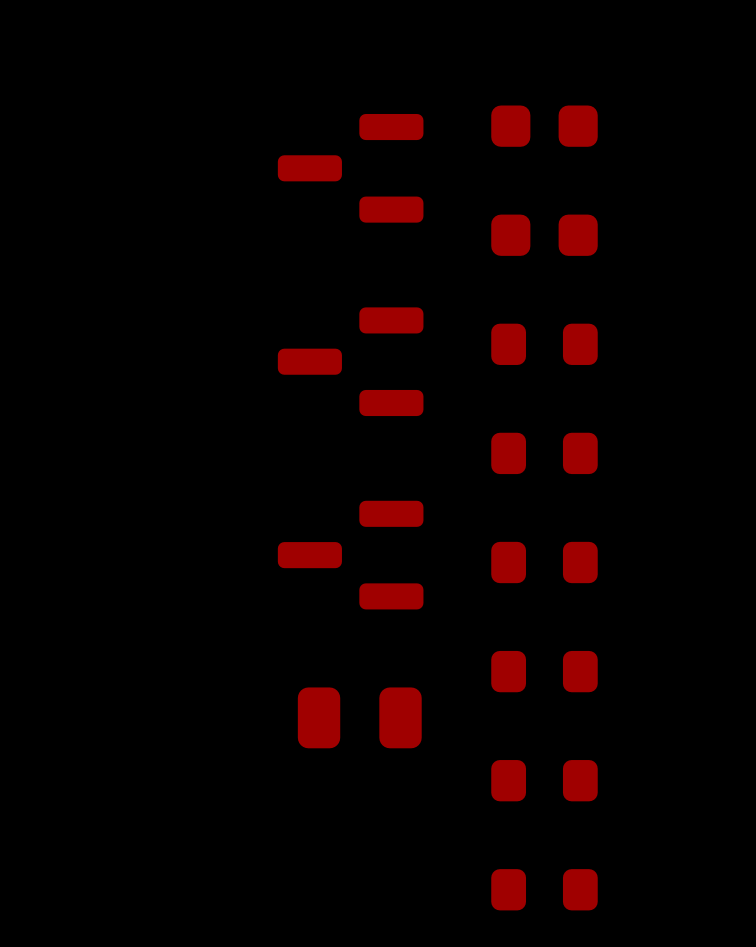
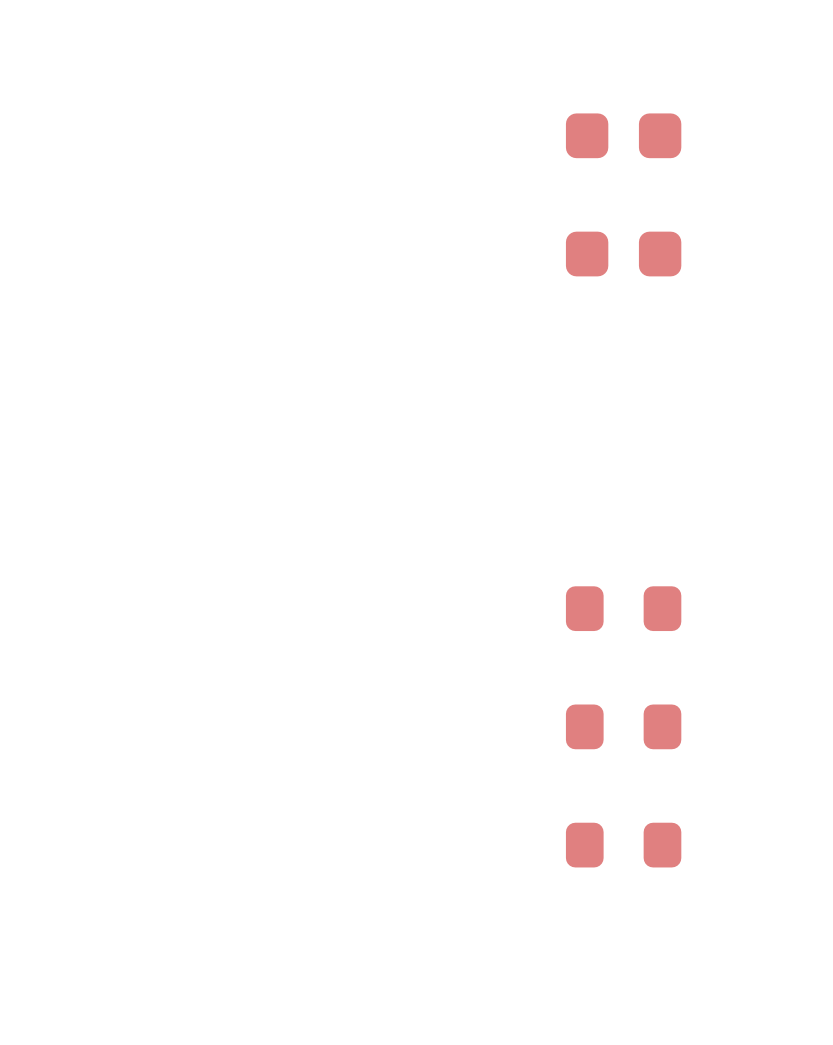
part: (350, 168) -> none
part: (544, 344) -> none
part: (350, 361) -> none
part: (544, 453) -> none
part: (350, 555) -> none
part: (359, 717) -> none
part: (544, 889) -> none

